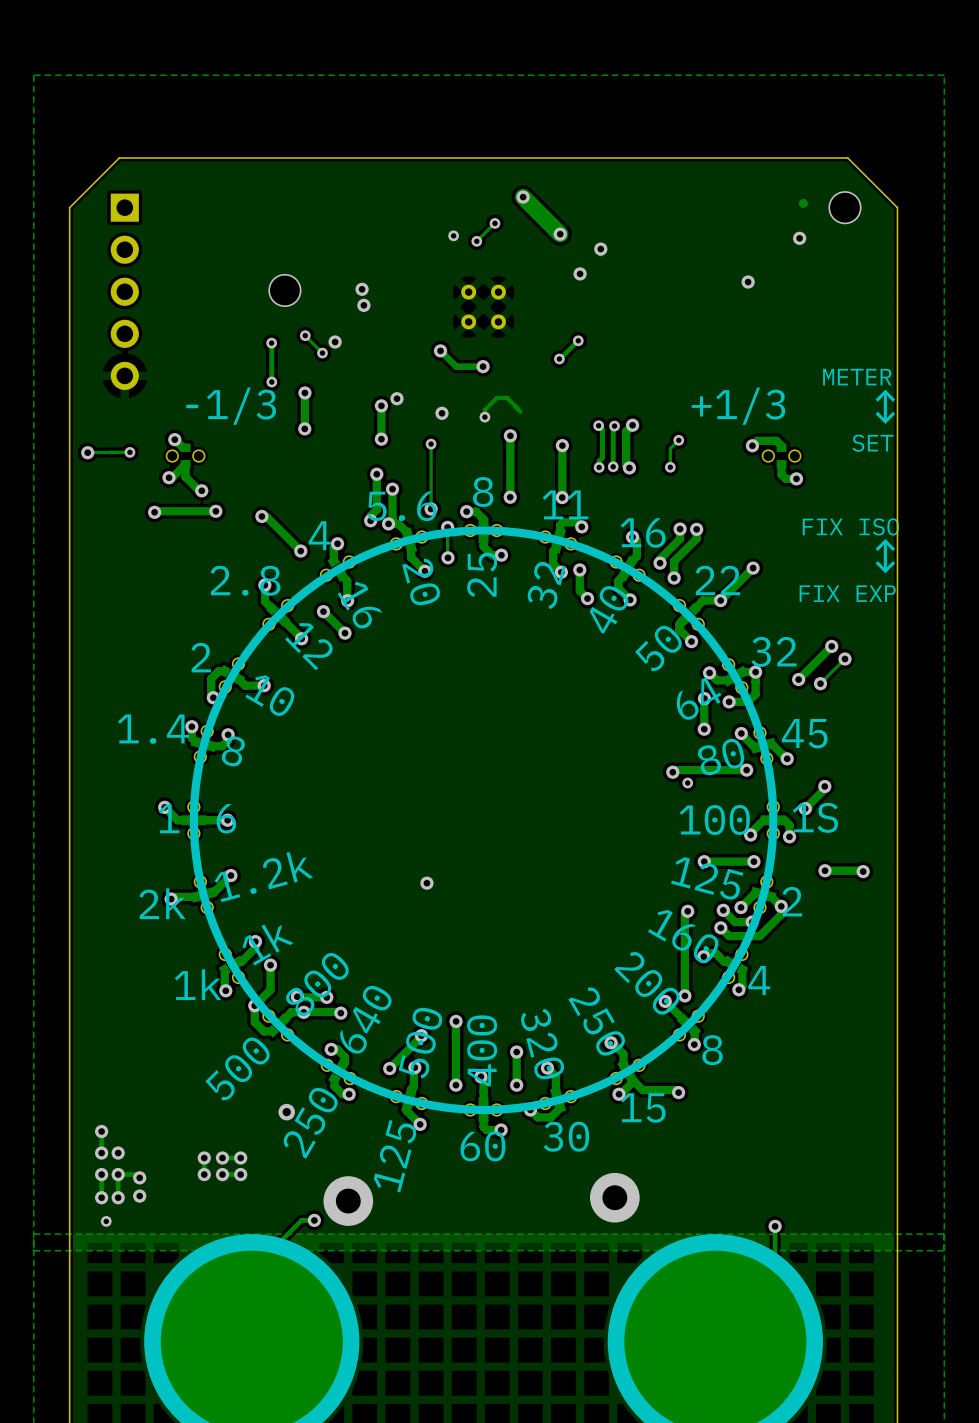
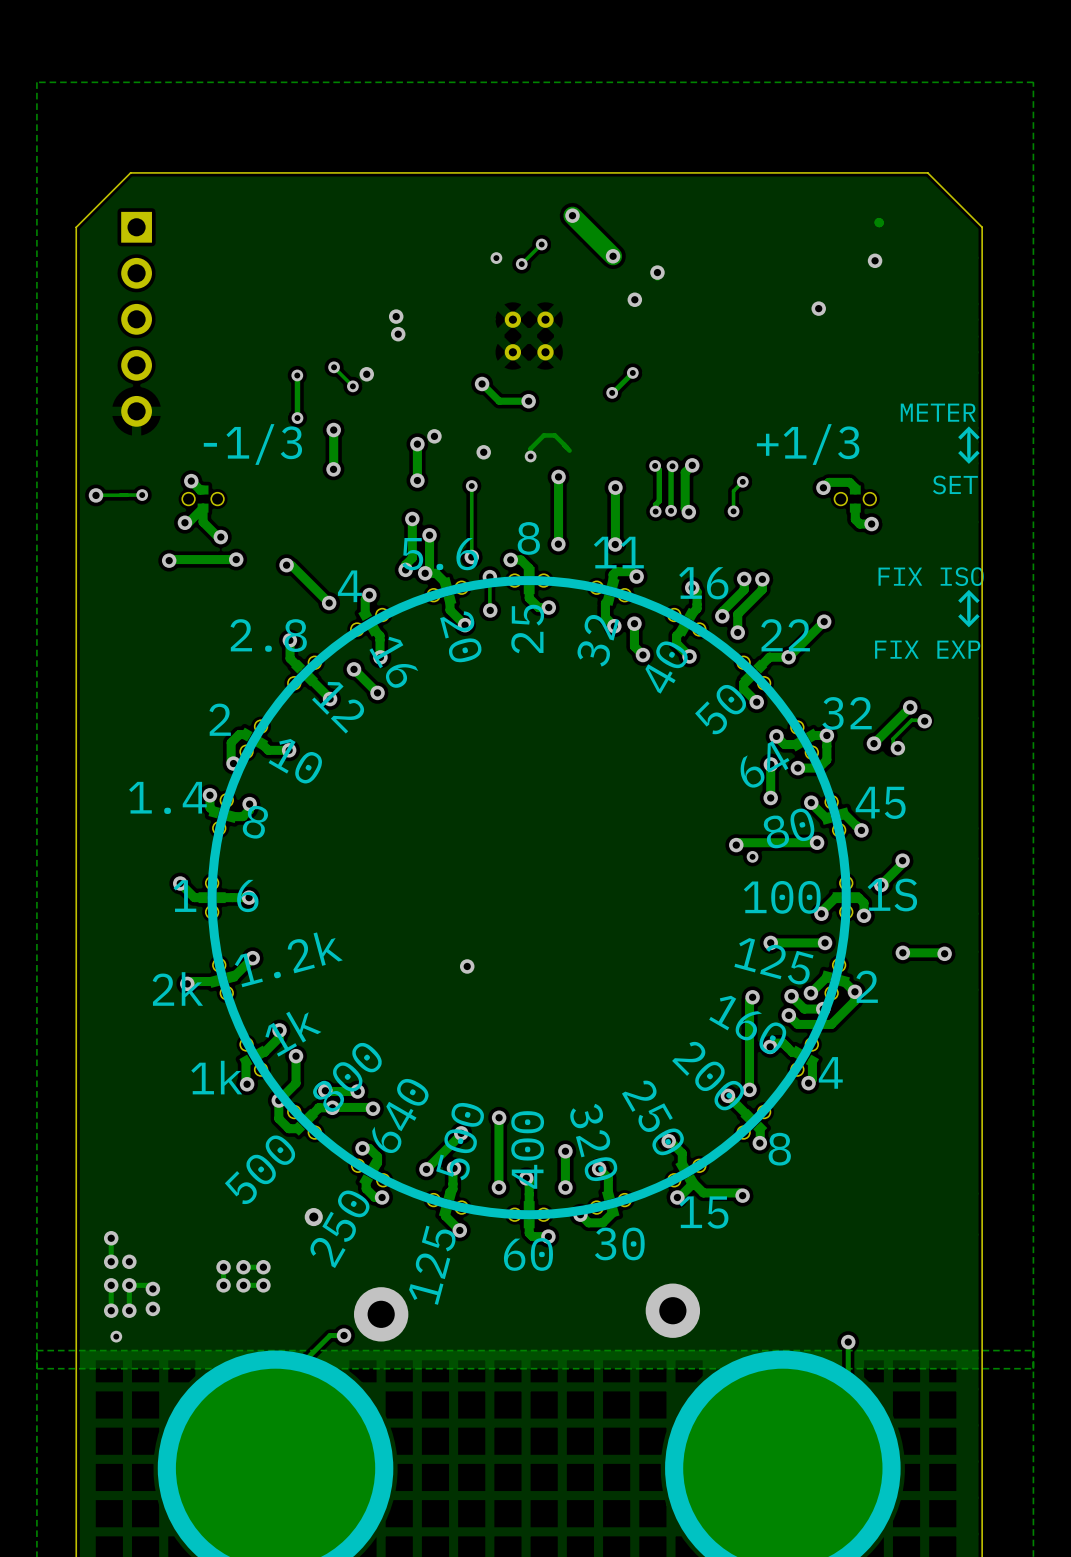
via: (844, 207) -> none
via: (284, 290) -> none
track: none -> (923, 720) (911, 720) (893, 738) (893, 746)
track: (844, 659) (820, 683) -> none

